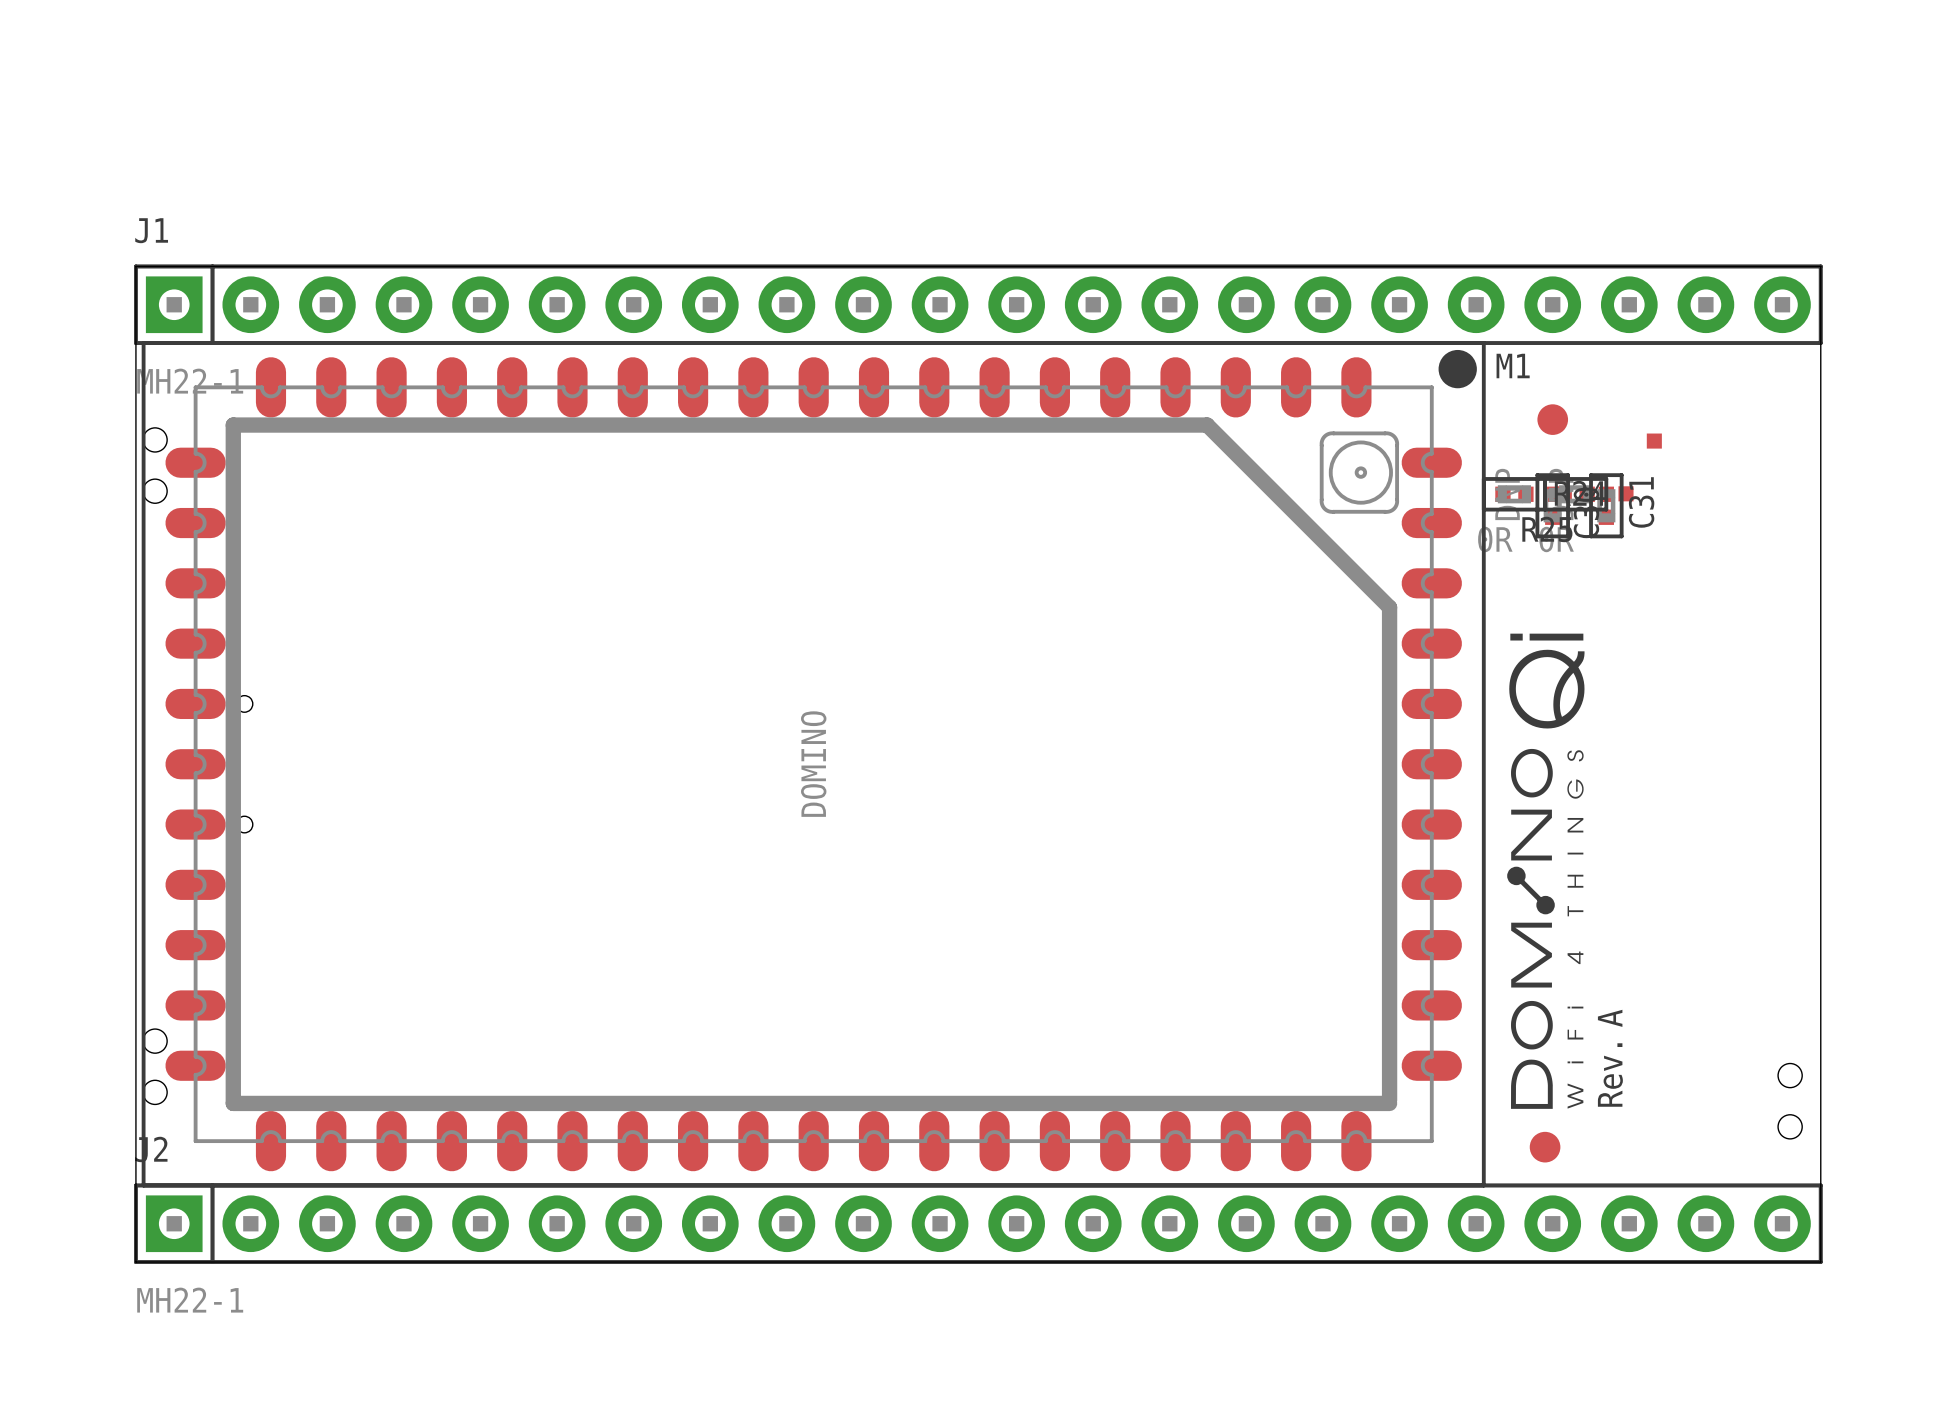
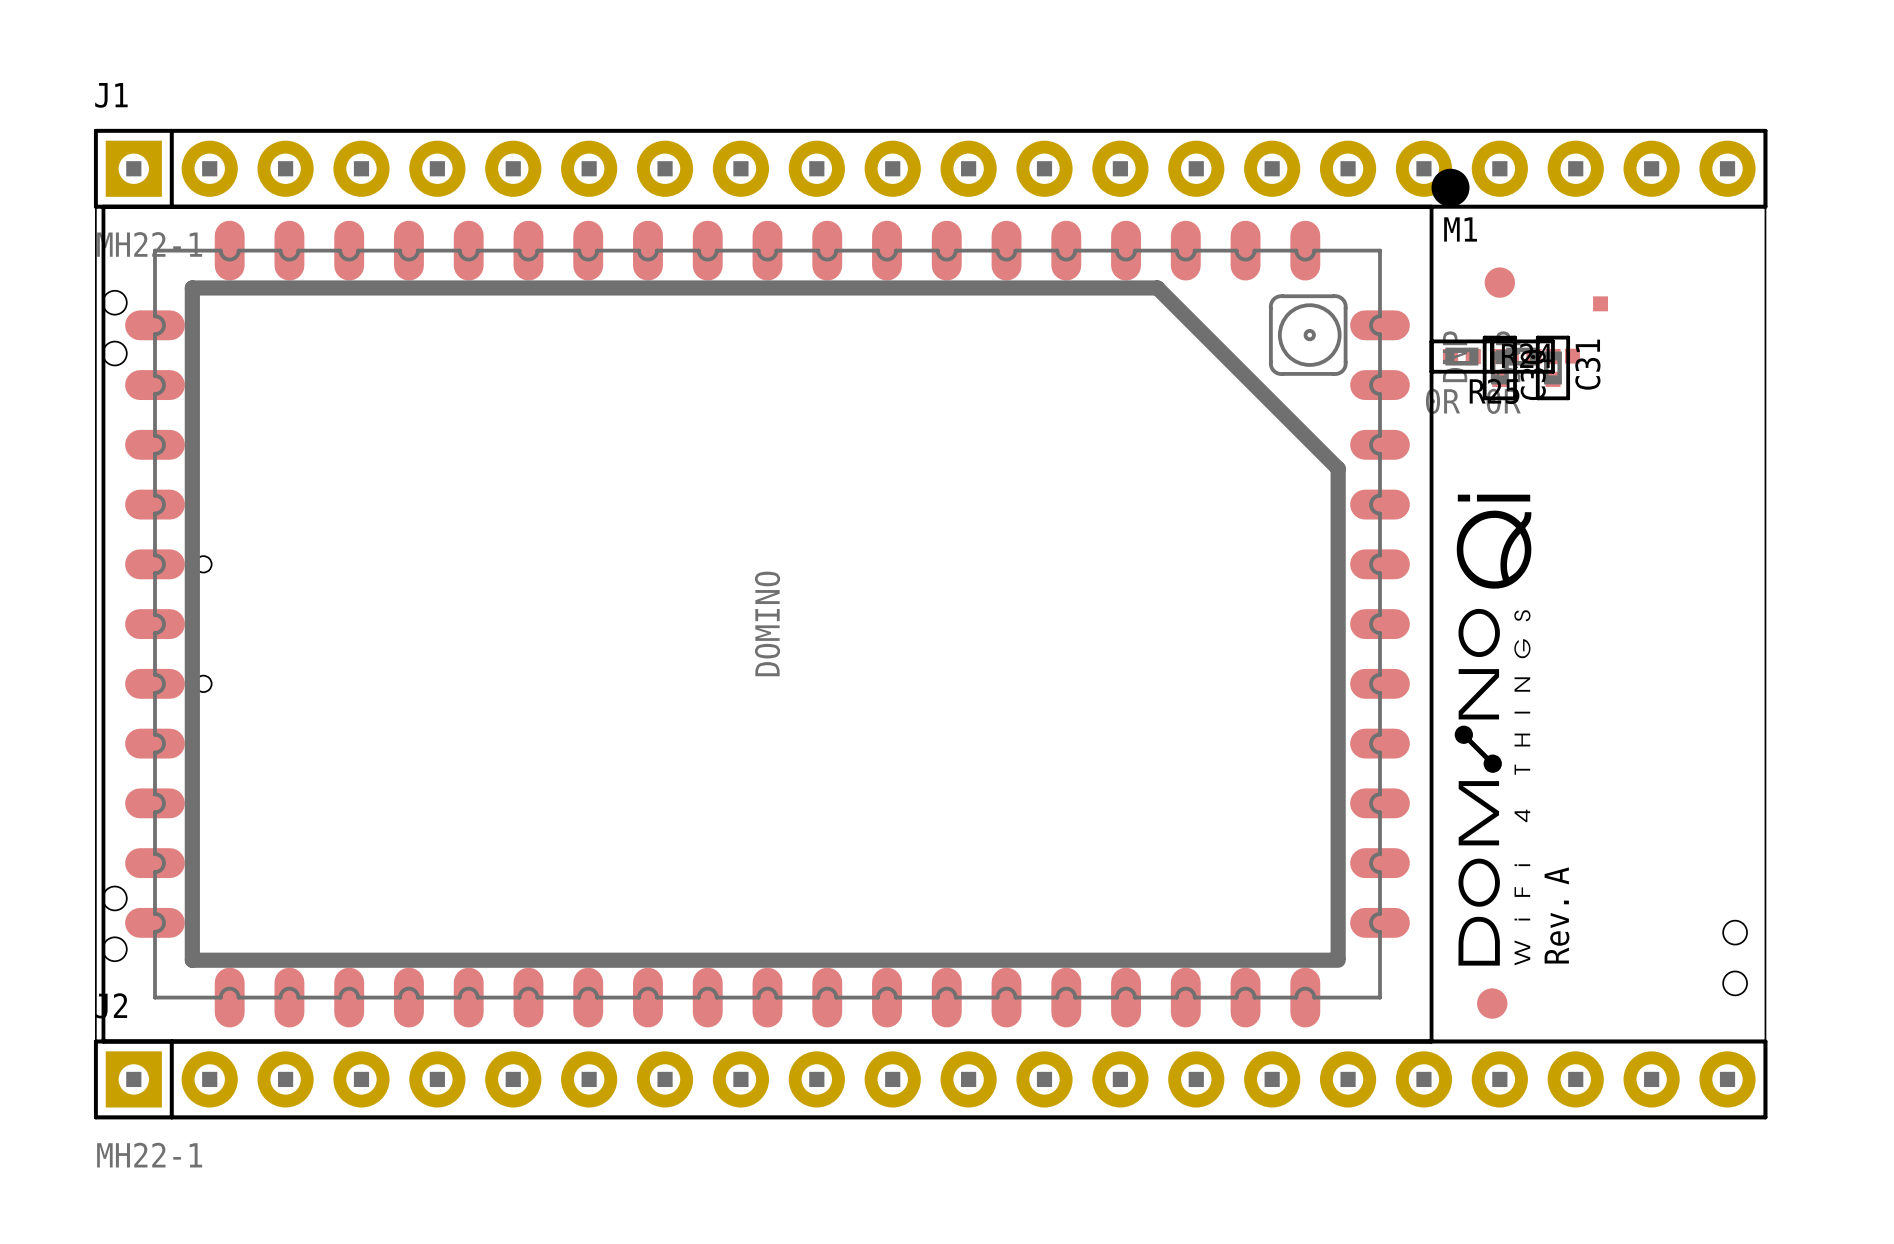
M1 footprint: [141, 341, 1486, 1188] -> [101, 168, 1470, 1044]

